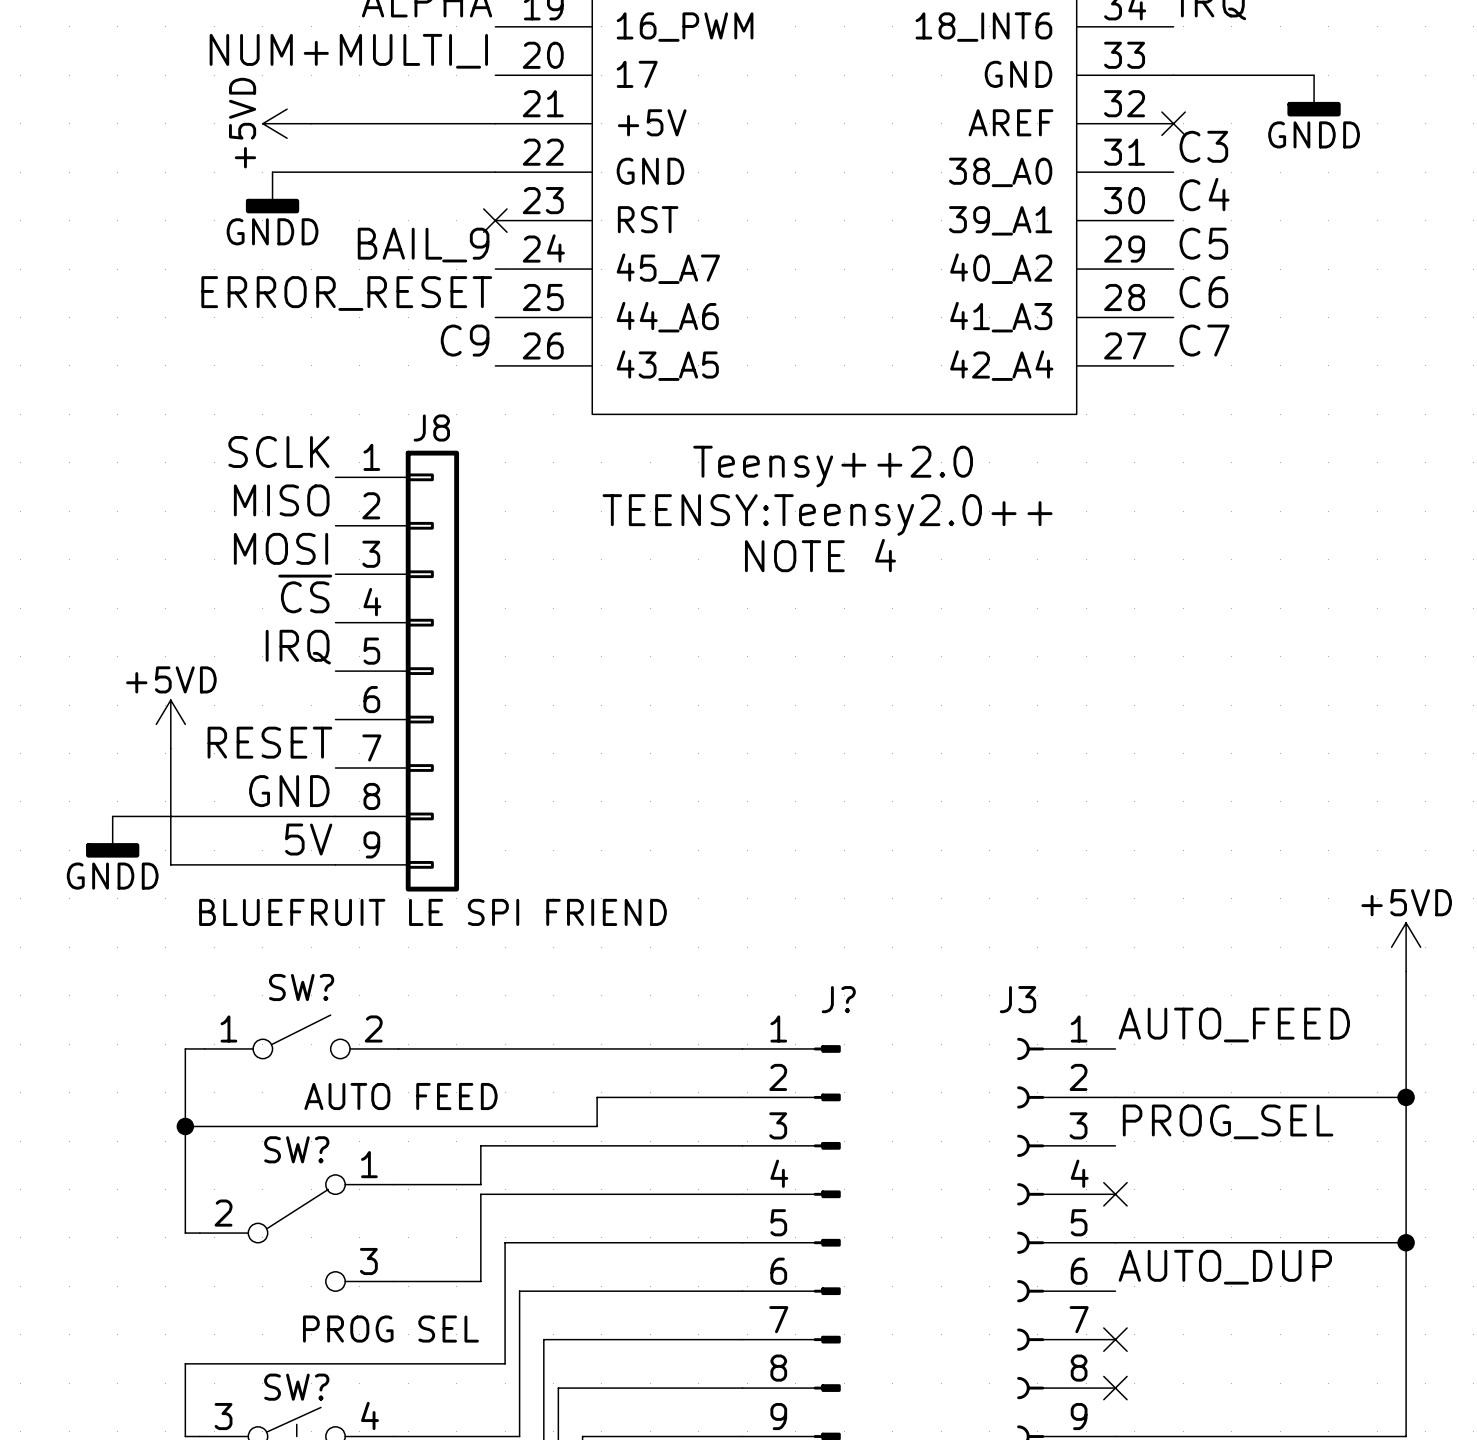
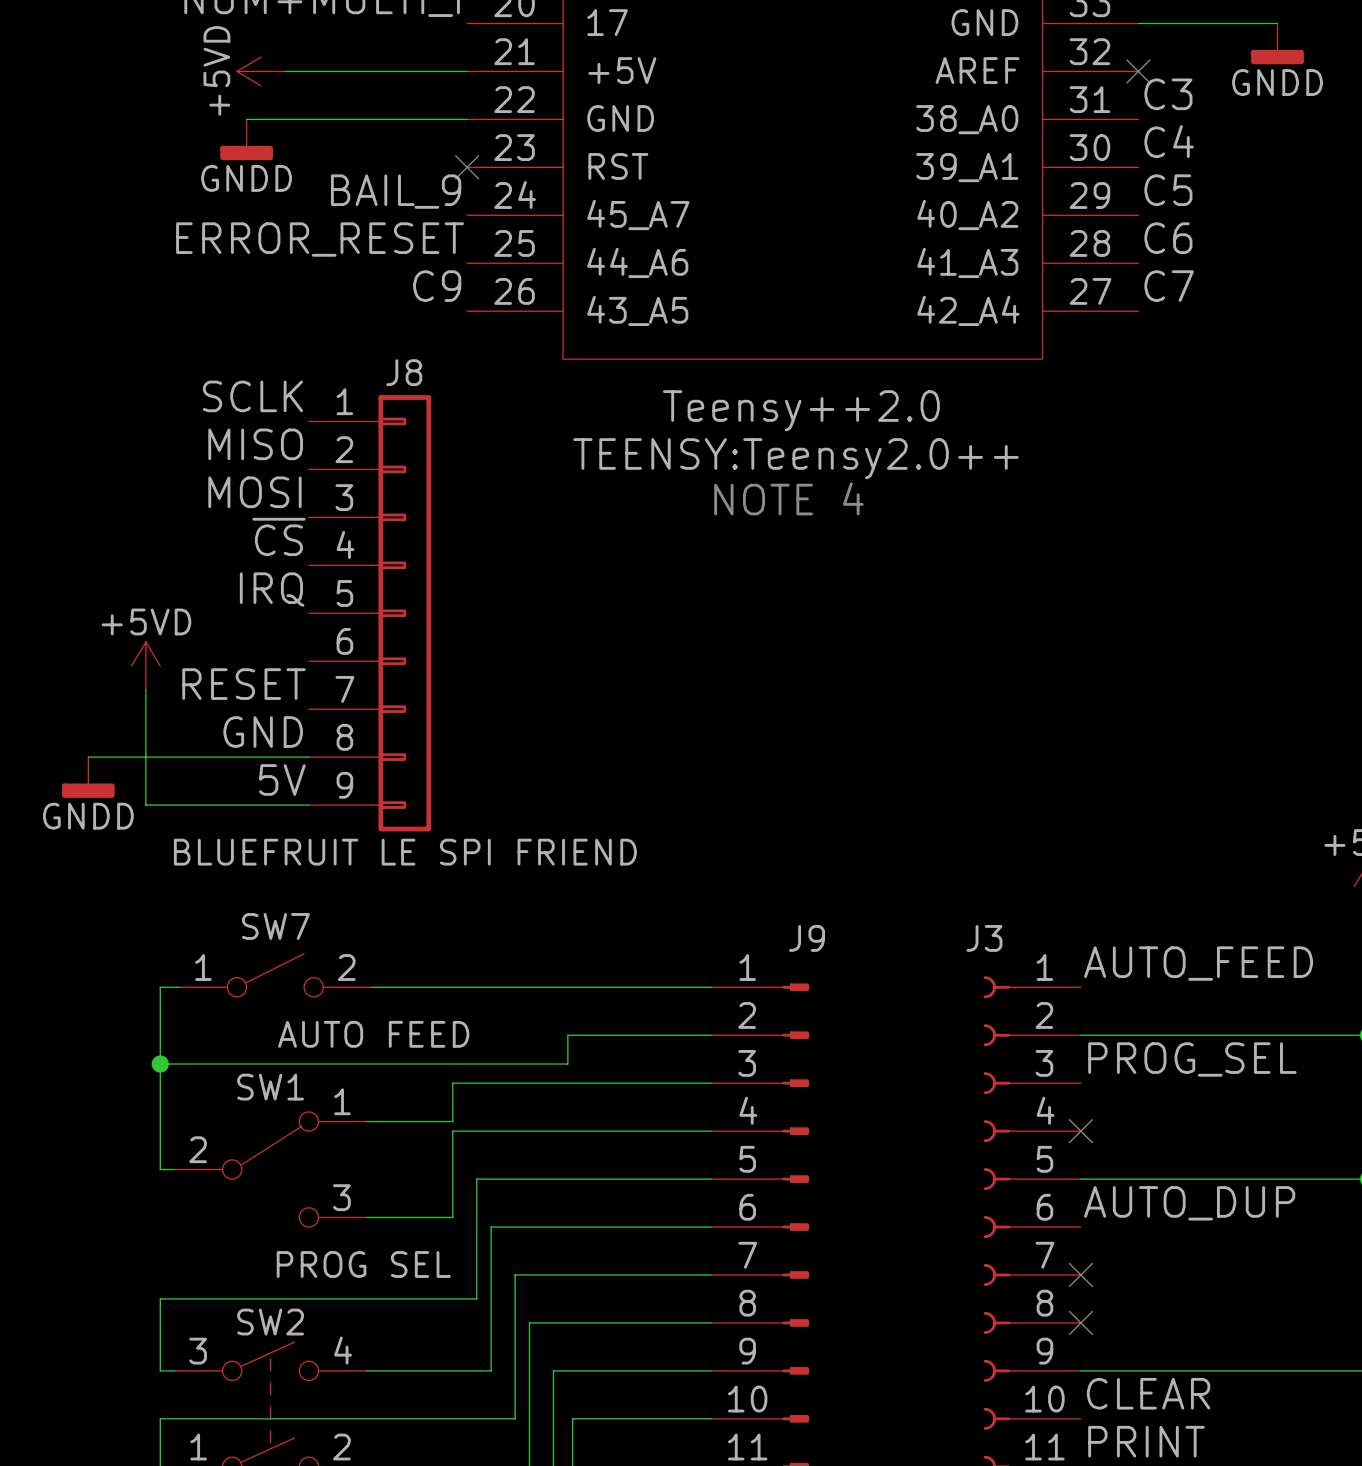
SW? name: SW? (301, 987) -> SW7 (275, 926)
J? name: J? (838, 999) -> J9 (807, 938)
SW? name: SW? (296, 1149) -> SW1 (270, 1087)
SW? name: SW? (296, 1387) -> SW2 (270, 1322)

